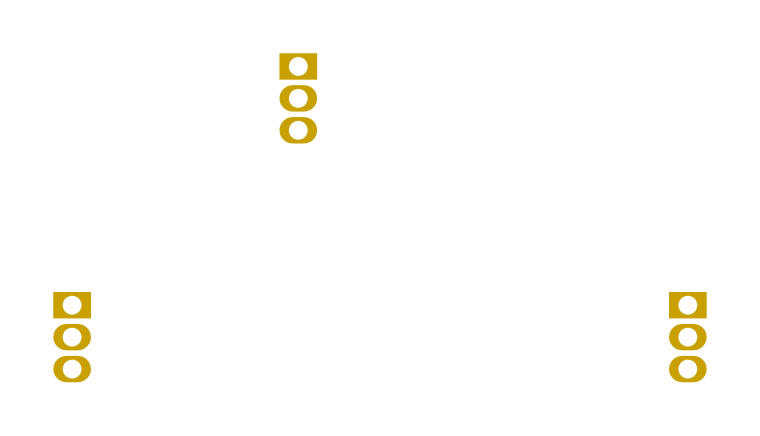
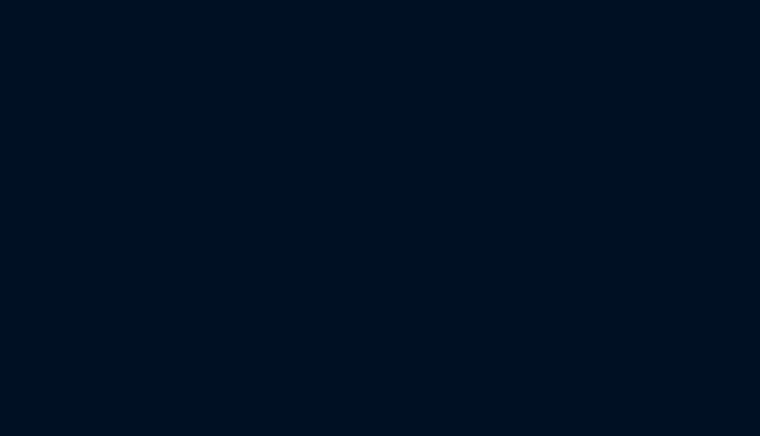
part: (298, 98) -> none
part: (72, 337) -> none
part: (687, 337) -> none

